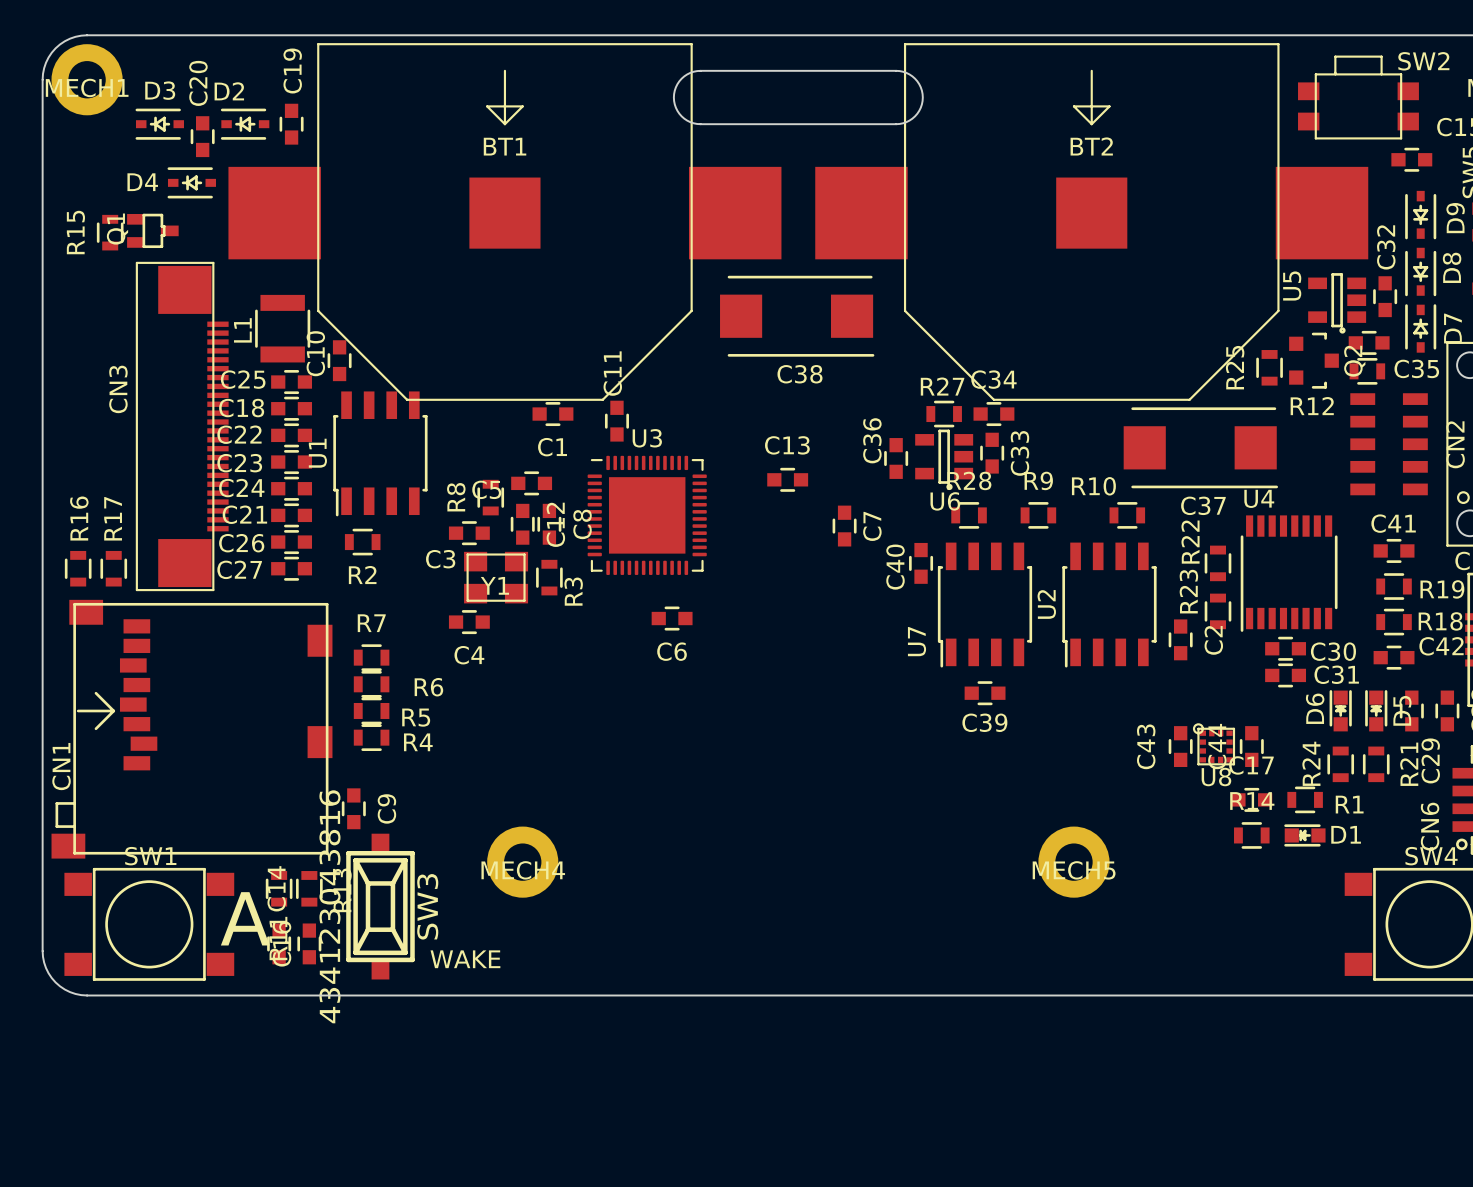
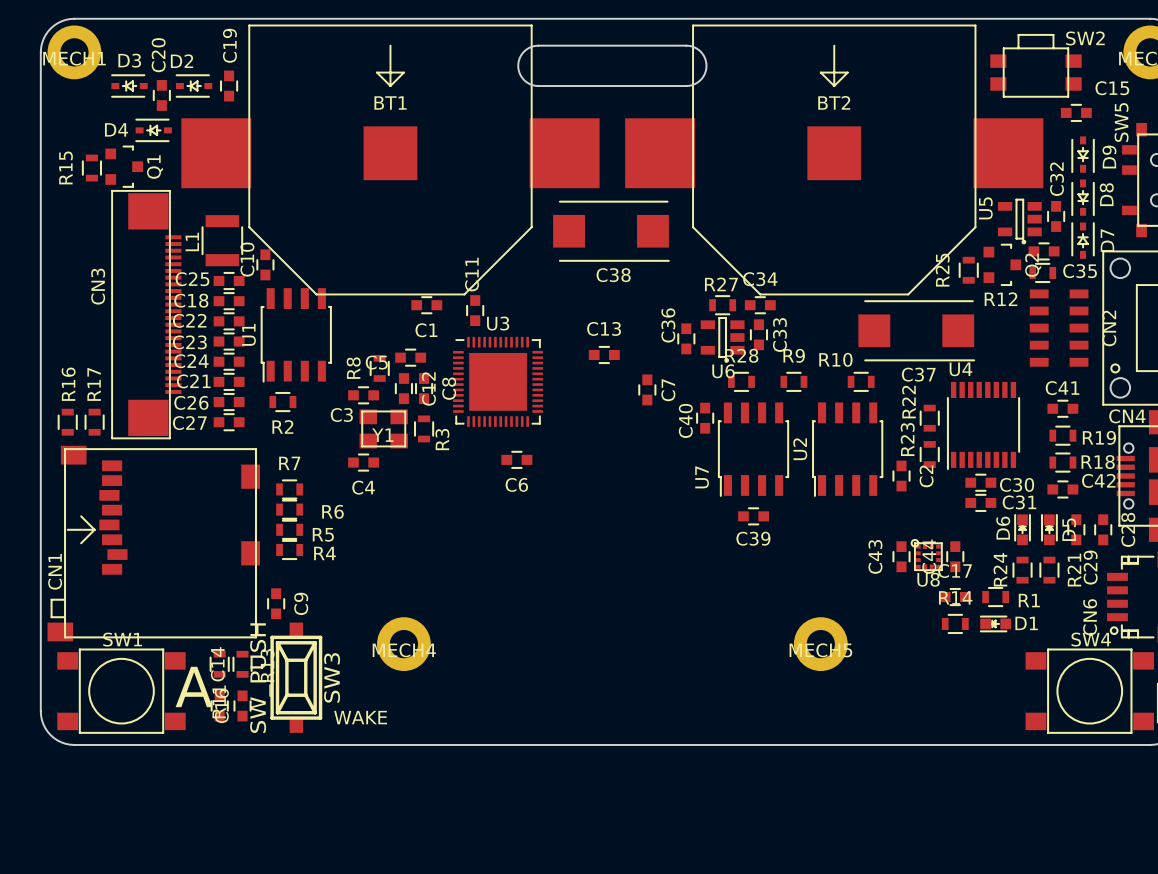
Q1 footprint: [127, 213, 179, 249] -> [105, 145, 144, 188]
Q1 name position: Q1 (117, 229) -> Q1 (155, 167)
SW3 value: 434123043816 (329, 906) -> SW_PUSH (260, 678)

